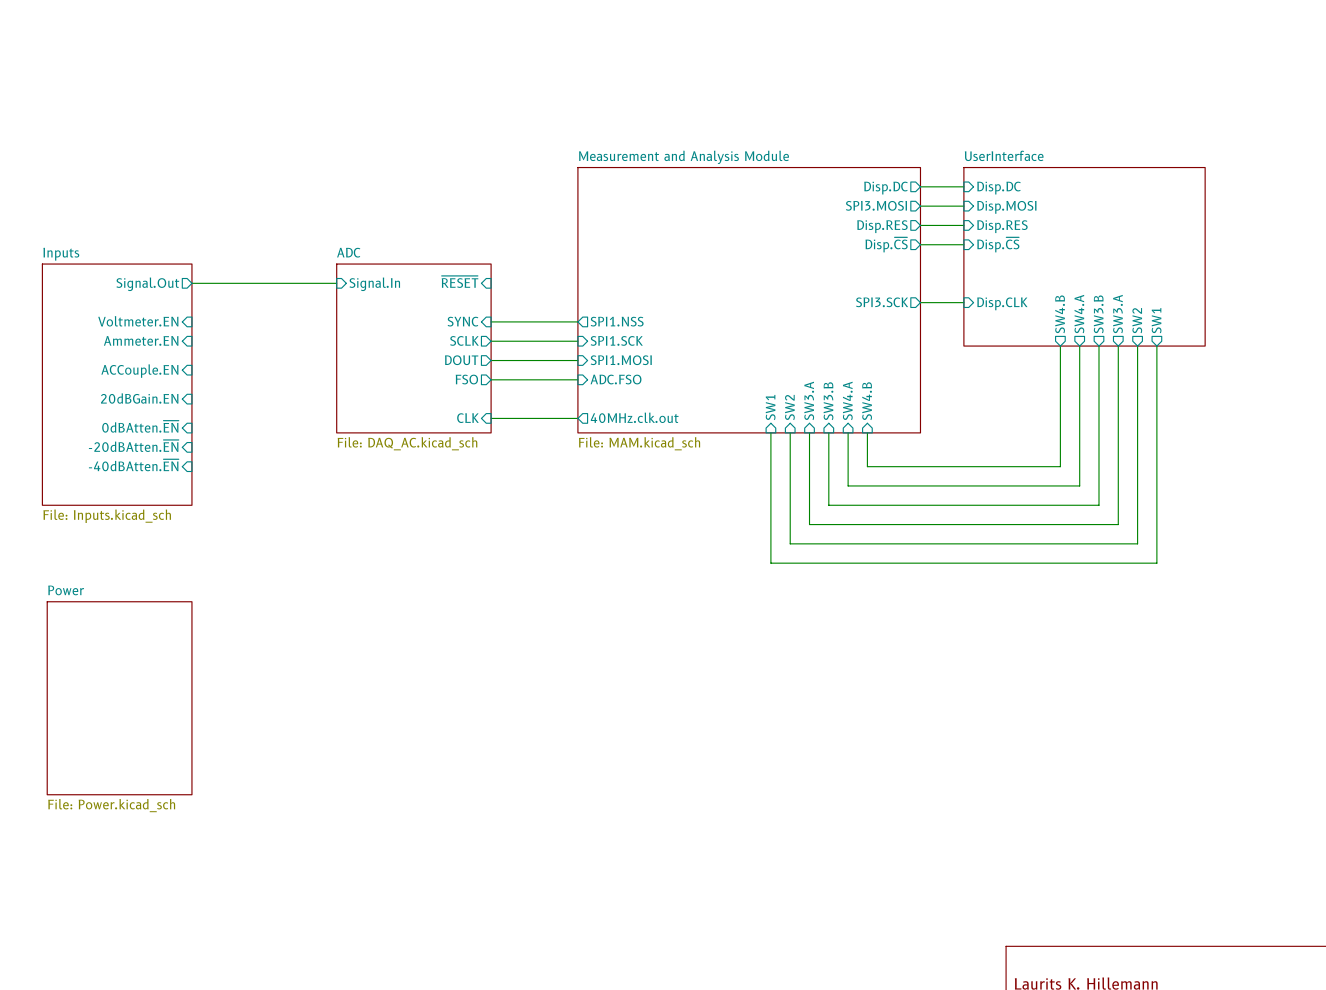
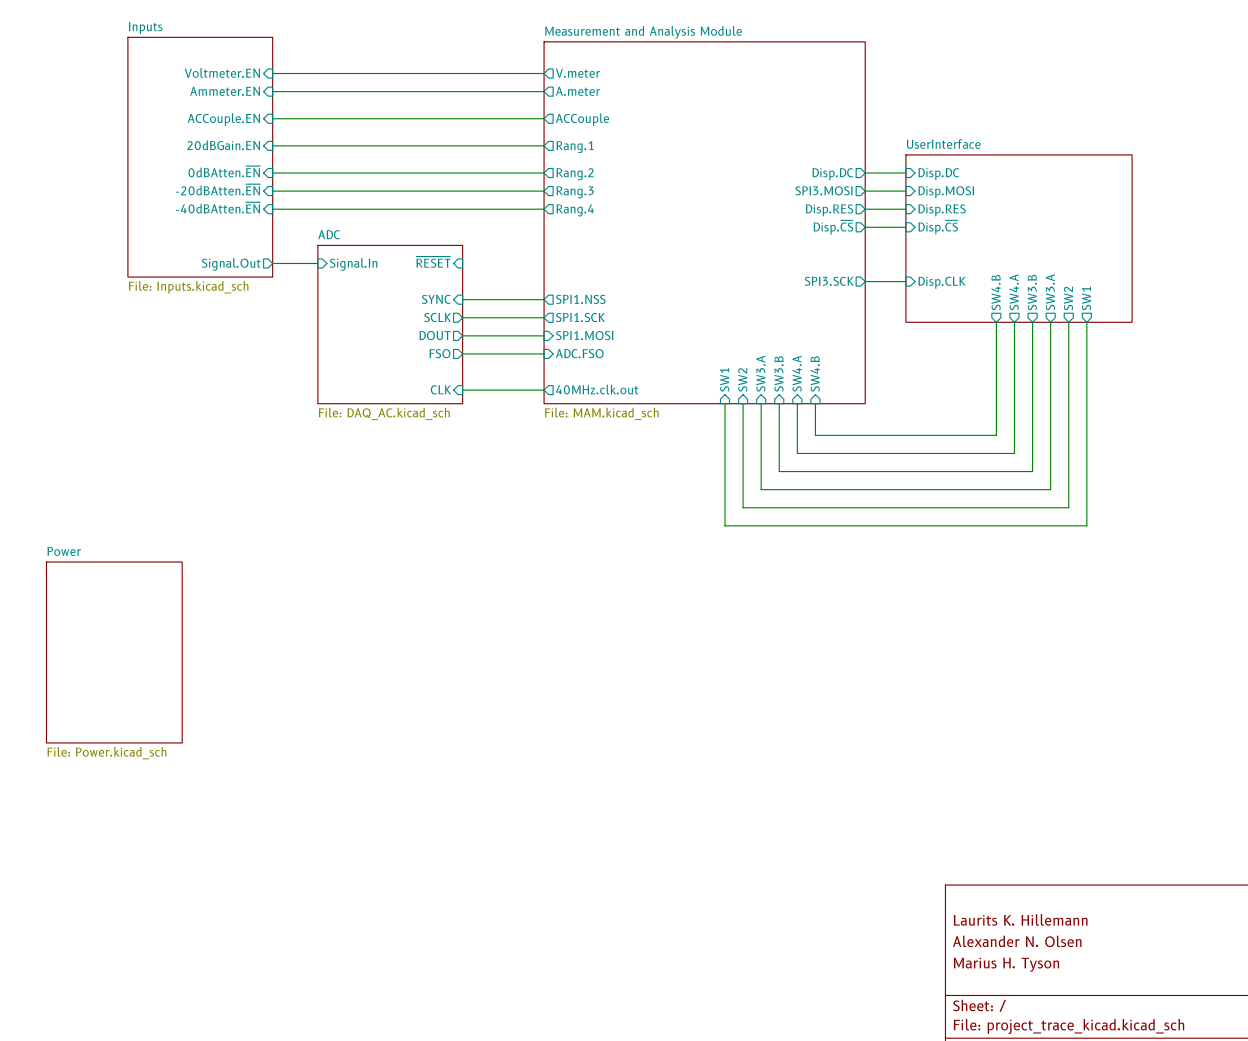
sheet pin: none -> Voltmeter.EN (222, 72)
wire: none -> (272, 73) (544, 73)
sheet pin: none -> V.meter (578, 73)
sheet pin: none -> Ammeter.EN (225, 91)
wire: none -> (272, 91) (544, 91)
sheet pin: none -> A.meter (578, 91)
wire: none -> (272, 118) (544, 118)
sheet pin: none -> ACCouple.EN (223, 119)
sheet pin: none -> ACCouple (582, 119)
sheet pin: none -> 20dBGain.EN (223, 145)
wire: none -> (272, 145) (544, 145)
sheet pin: none -> Rang.1 (575, 147)
sheet Inputs: none -> File: Inputs.kicad_sch (200, 157)
sheet pin: none -> 0dBAtten.~{EN} (224, 171)
wire: none -> (272, 173) (544, 173)
sheet pin: none -> Rang.2 (575, 174)
sheet pin: none -> -20dBAtten.~{EN} (218, 189)
wire: none -> (272, 191) (544, 191)
sheet pin: none -> Rang.3 (575, 192)
sheet pin: none -> -40dBAtten.~{EN} (218, 207)
wire: none -> (272, 209) (544, 209)
sheet pin: none -> Rang.4 (575, 210)
sheet Measurement and Analysis Module: none -> File: MAM.kicad_sch (704, 222)
wire: (191, 283) (288, 283) -> none
sheet pin position: Signal.Out (147, 284) -> Signal.Out (231, 264)
sheet Measurement and Analysis Module: File: MAM.kicad_sch (749, 300) -> none
sheet pin: Voltmeter.EN (138, 321) -> none
sheet pin: Ammeter.EN (141, 340) -> none
sheet pin shape: input (616, 340) -> output (580, 317)
sheet pin: ACCouple.EN (139, 371) -> none
sheet Inputs: File: Inputs.kicad_sch (117, 384) -> none
sheet pin: 20dBGain.EN (139, 398) -> none
sheet pin: 0dBAtten.~{EN} (140, 426) -> none
sheet pin: -20dBAtten.~{EN} (133, 445) -> none
sheet pin: -40dBAtten.~{EN} (133, 465) -> none

